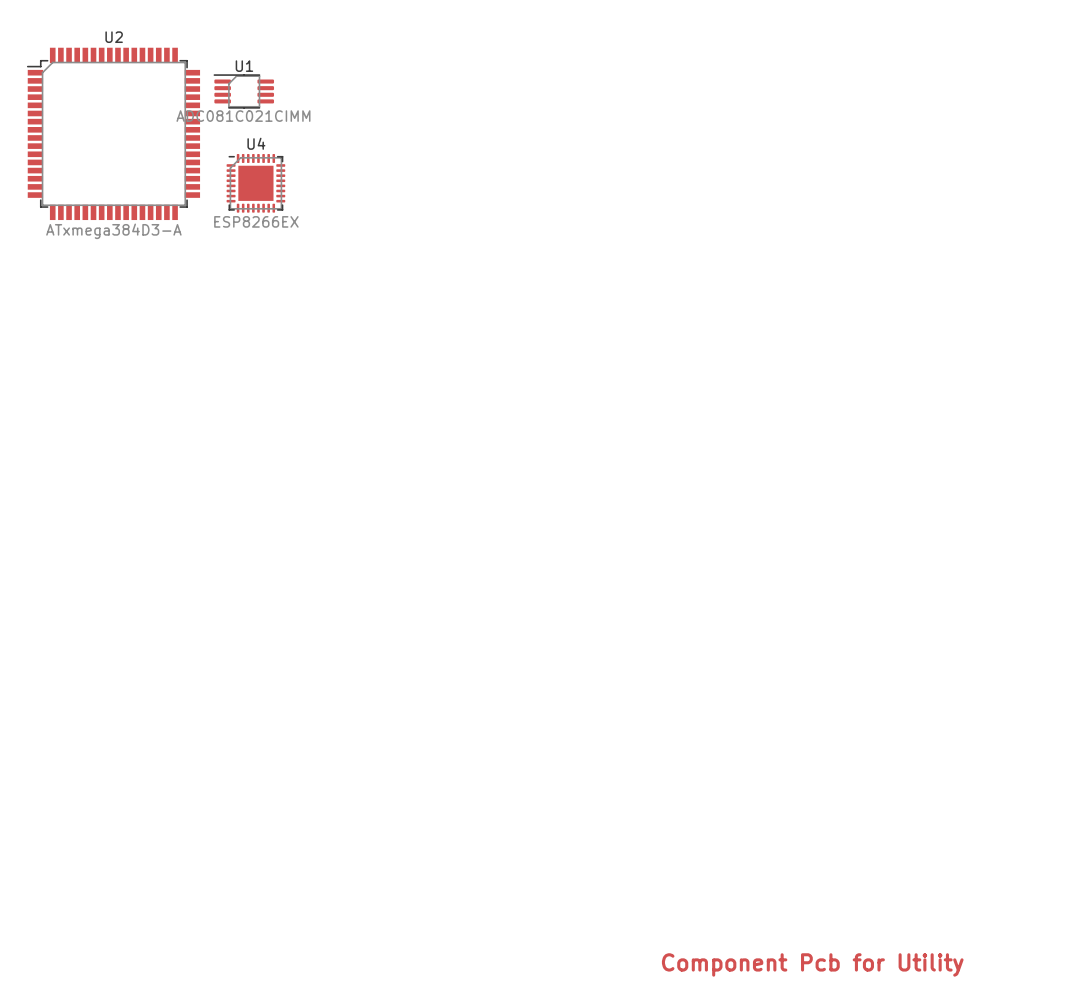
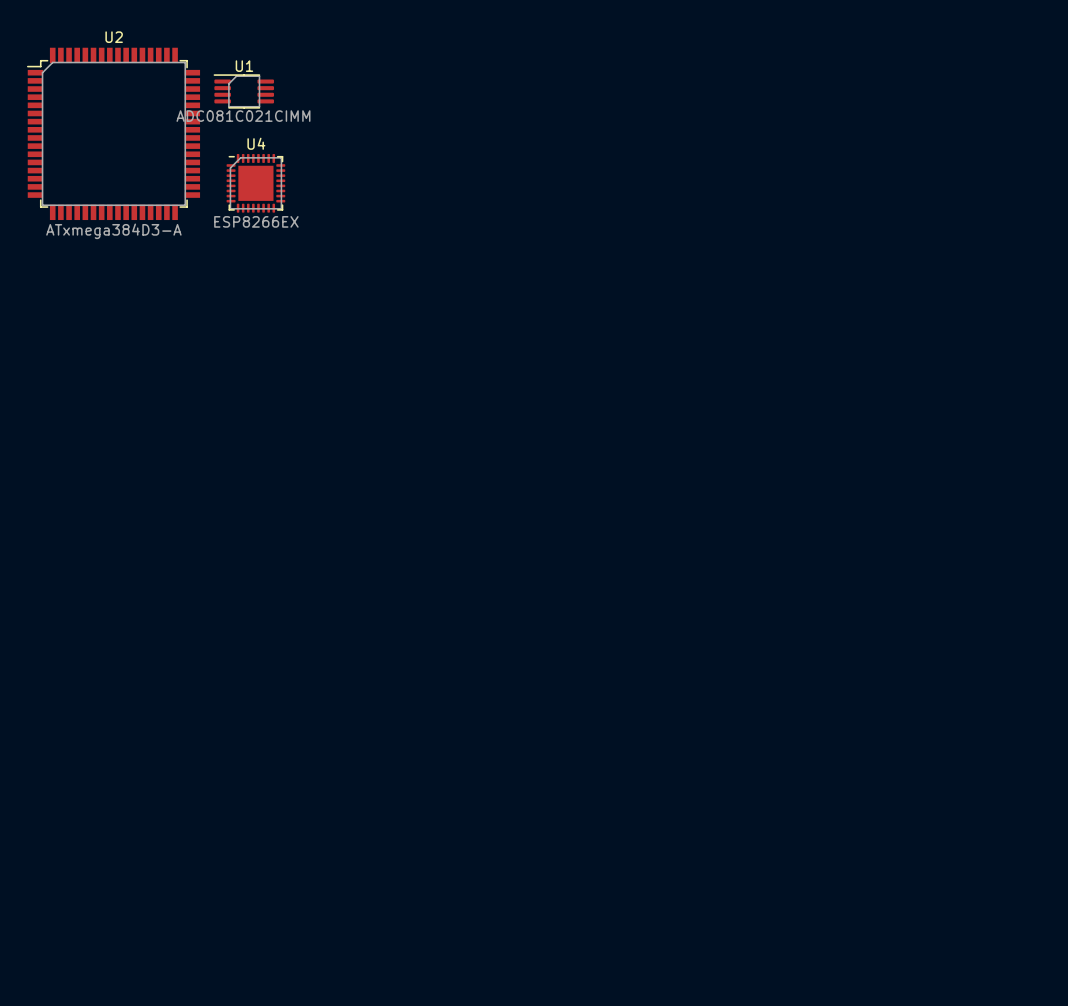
text: Component Pcb for Utility (812, 964) -> none

